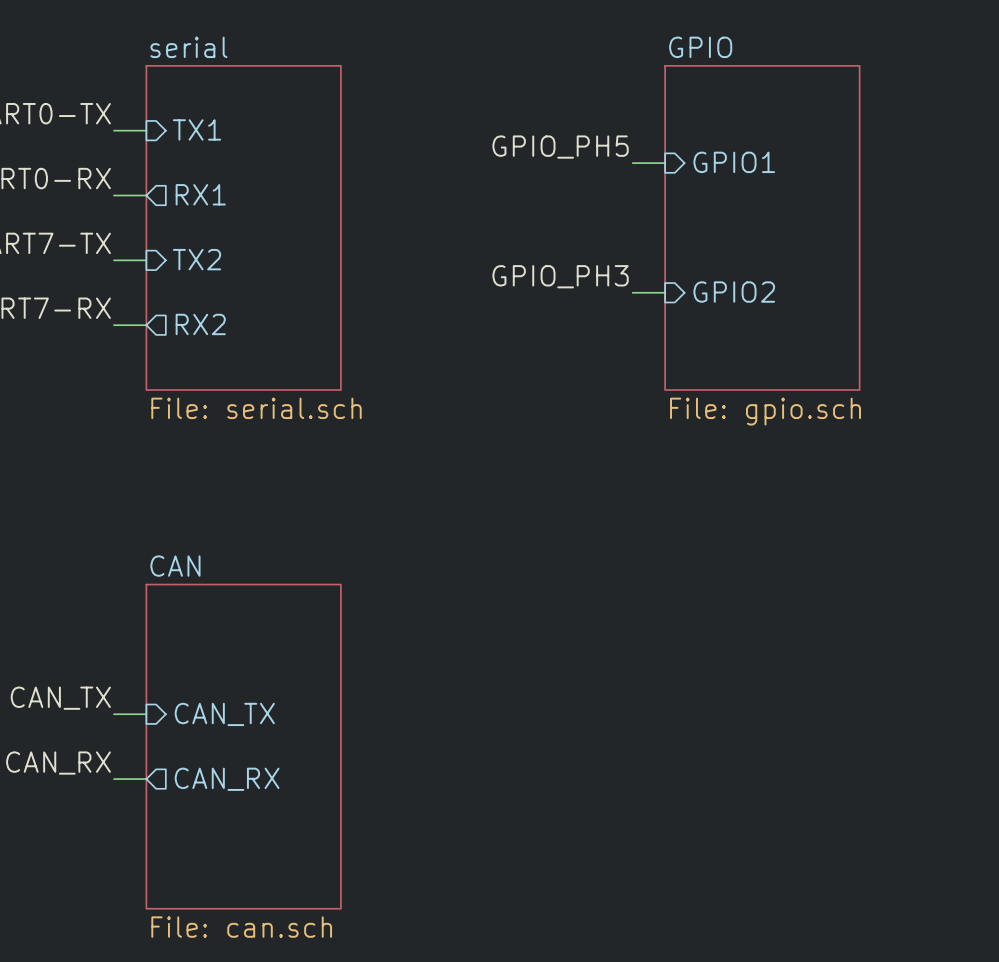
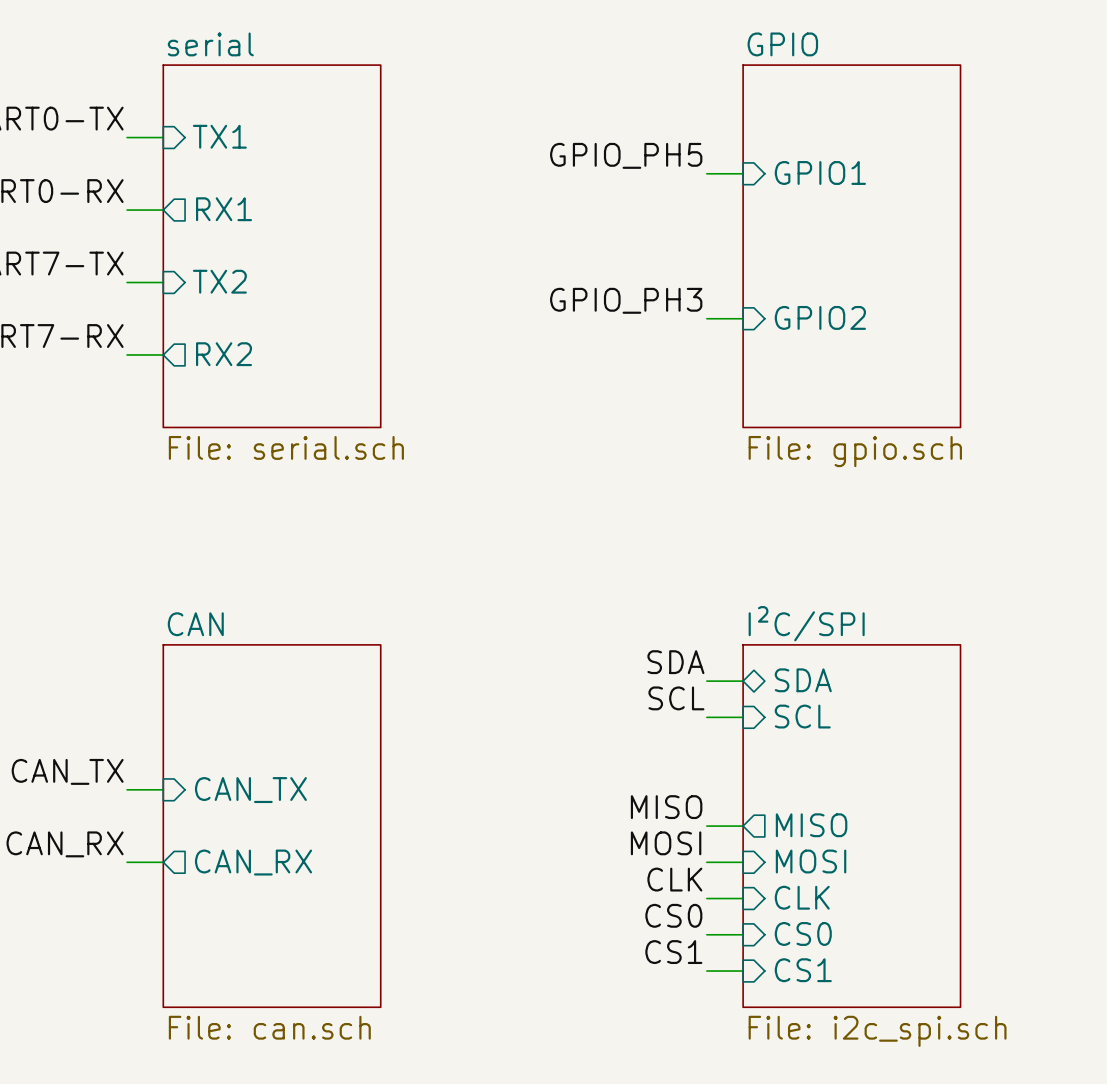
label: none -> SDA (675, 662)
wire: none -> (706, 681) (743, 681)
sheet pin: none -> SDA (803, 680)
label: none -> SCL (676, 698)
sheet pin: none -> SCL (802, 716)
wire: none -> (706, 717) (743, 717)
label: none -> MISO (666, 807)
sheet pin: none -> MISO (811, 825)
wire: none -> (706, 826) (743, 826)
sheet I²C/SPI: none -> File: i2c_spi.sch (851, 826)
label: none -> MOSI (666, 843)
sheet pin: none -> MOSI (811, 861)
wire: none -> (706, 862) (743, 862)
label: none -> CLK (674, 879)
sheet pin: none -> CLK (802, 897)
wire: none -> (706, 898) (743, 898)
label: none -> CS0 (673, 915)
wire: none -> (706, 934) (743, 934)
sheet pin: none -> CS0 (803, 933)
label: none -> CS1 (673, 952)
sheet pin: none -> CS1 (803, 970)
wire: none -> (706, 971) (743, 971)

